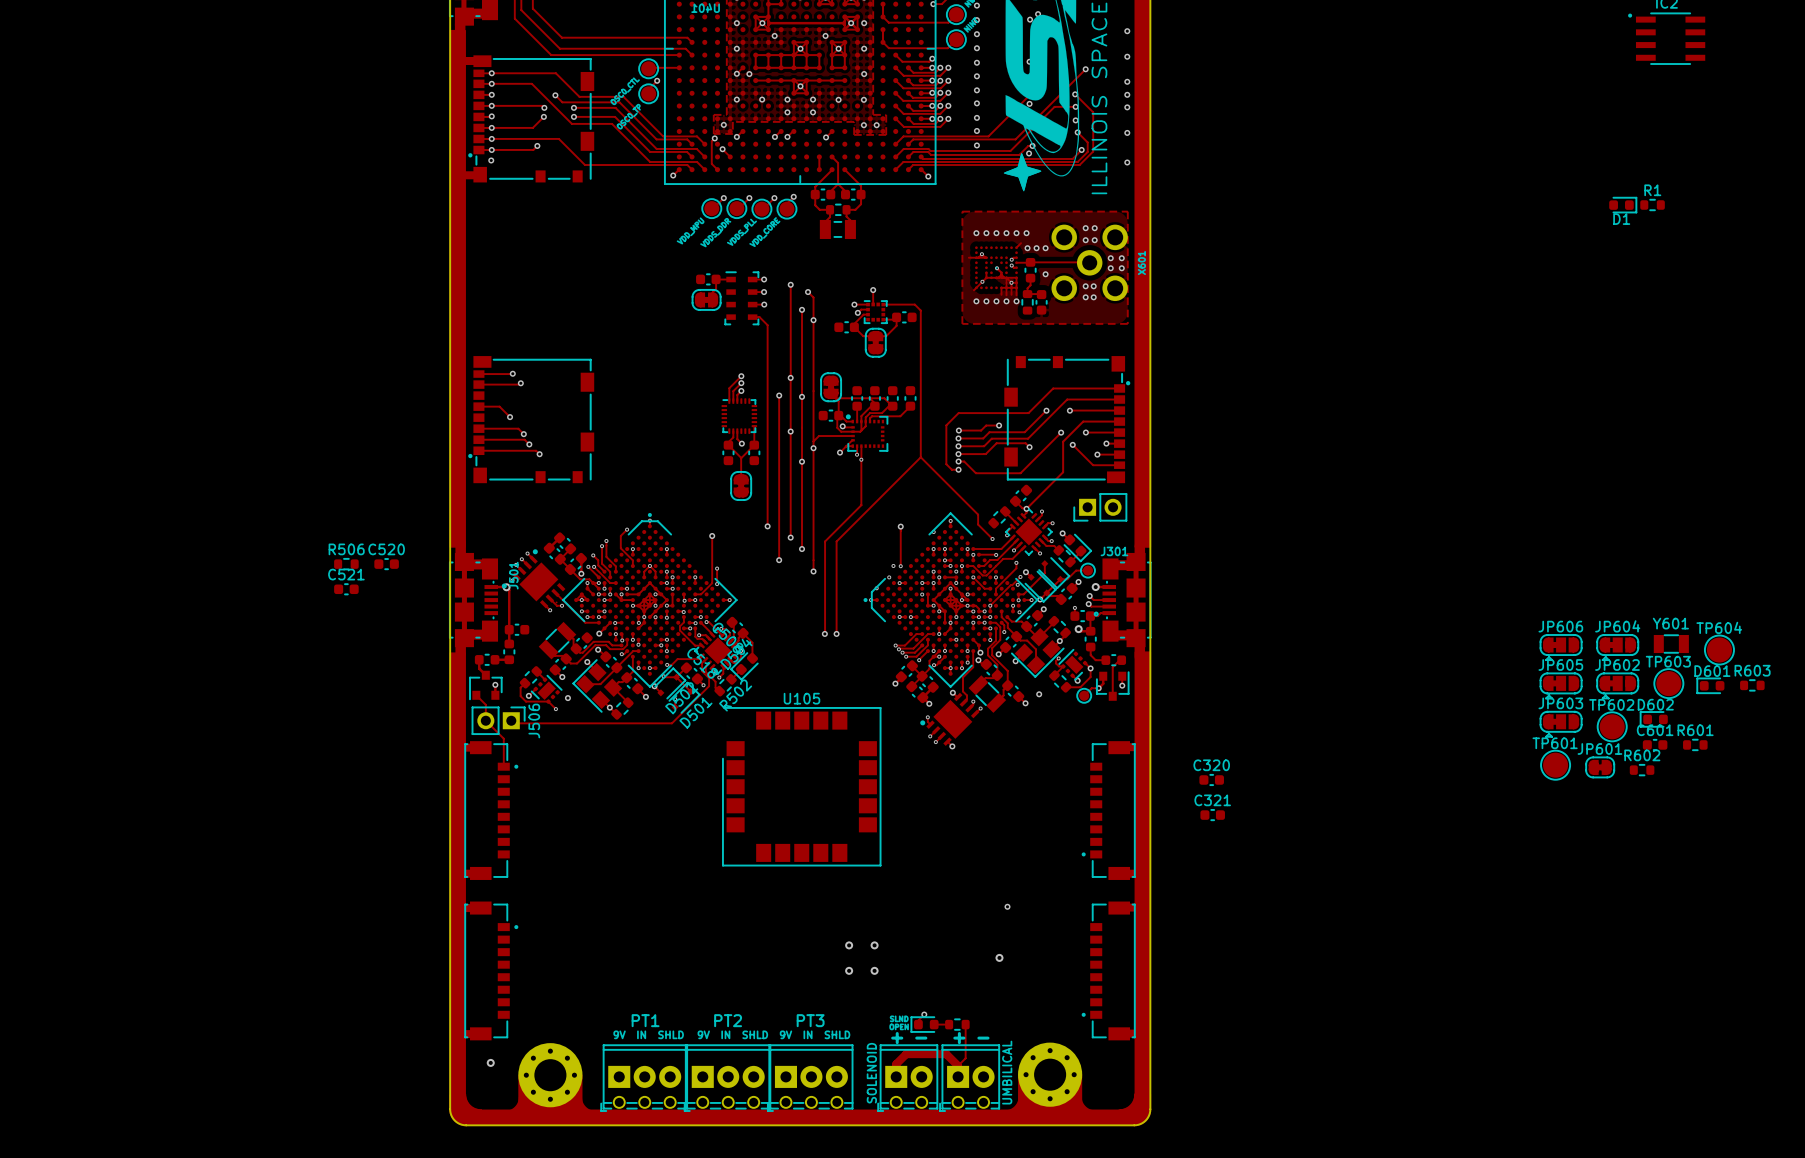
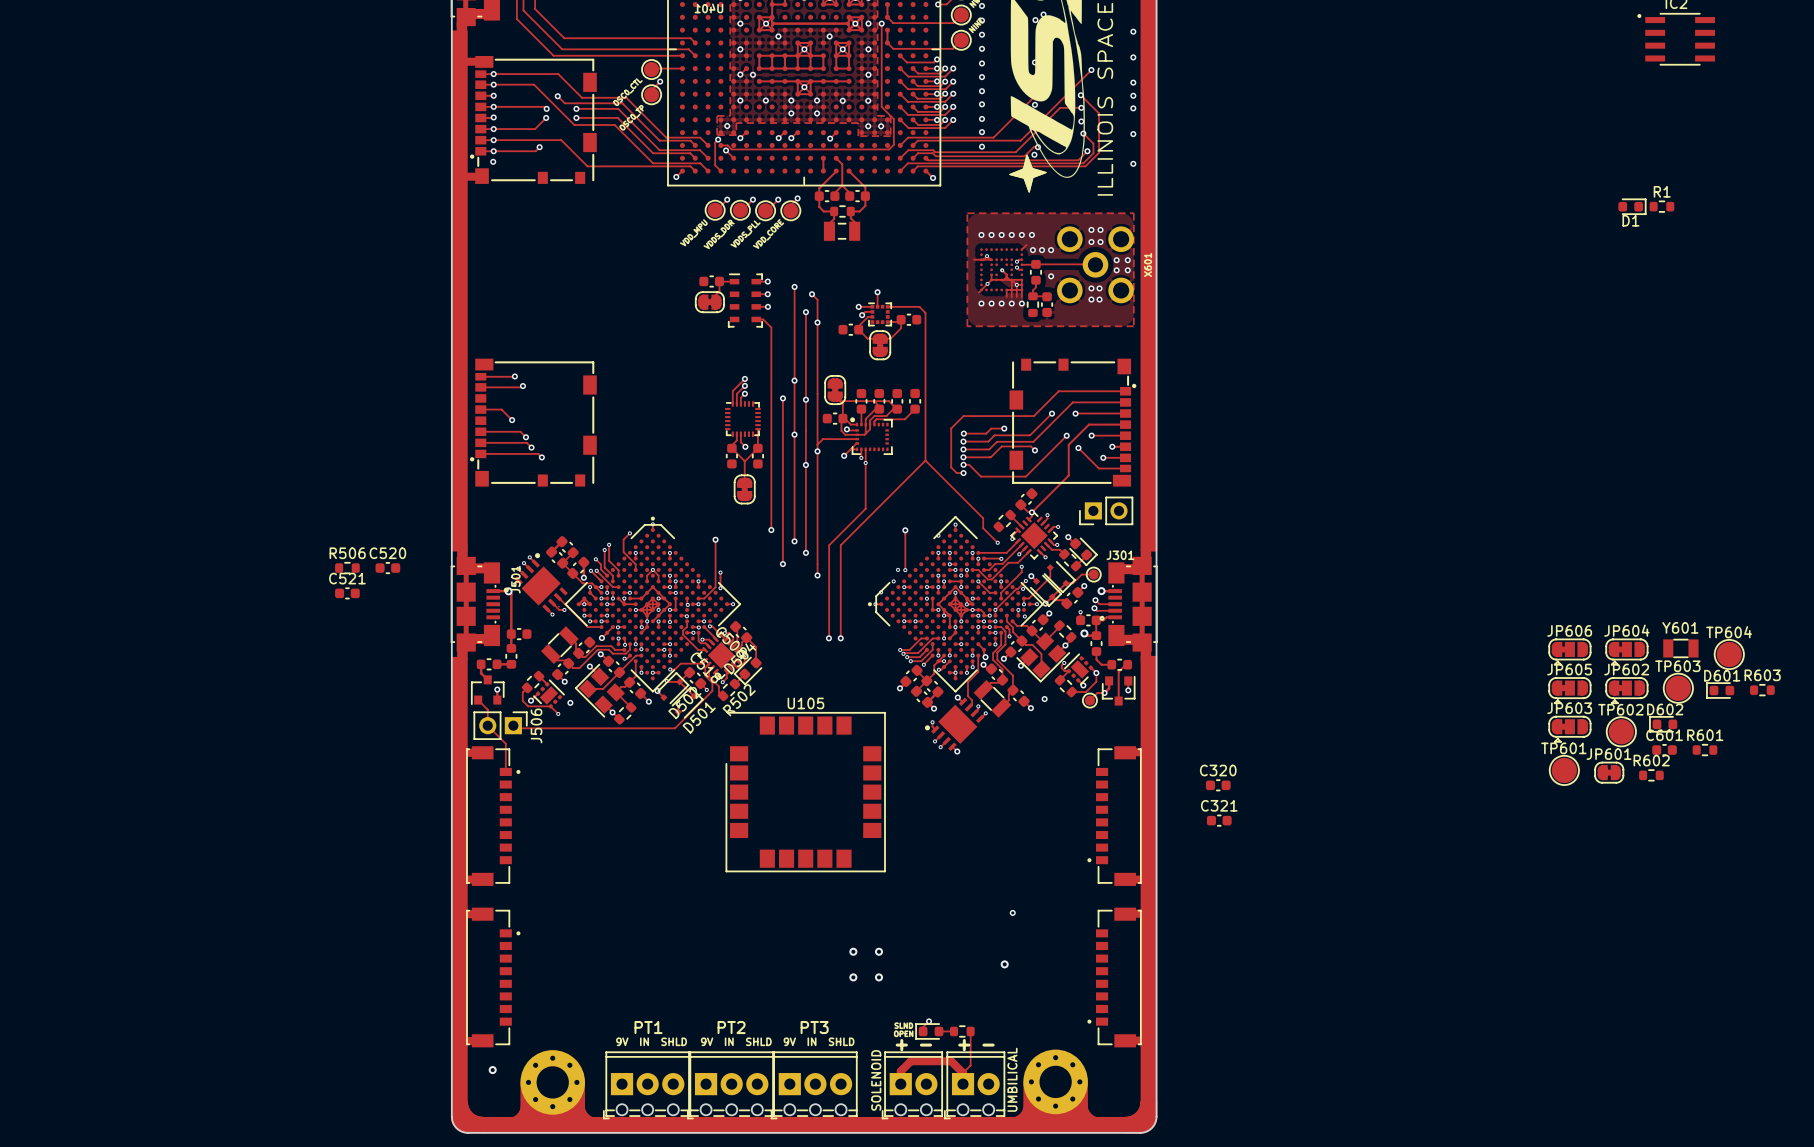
track: none -> (881, 23) (881, 106) (893, 119) (893, 144) (889, 149) (731, 149) (727, 145) (720, 145)
via: none -> (881, 23)

